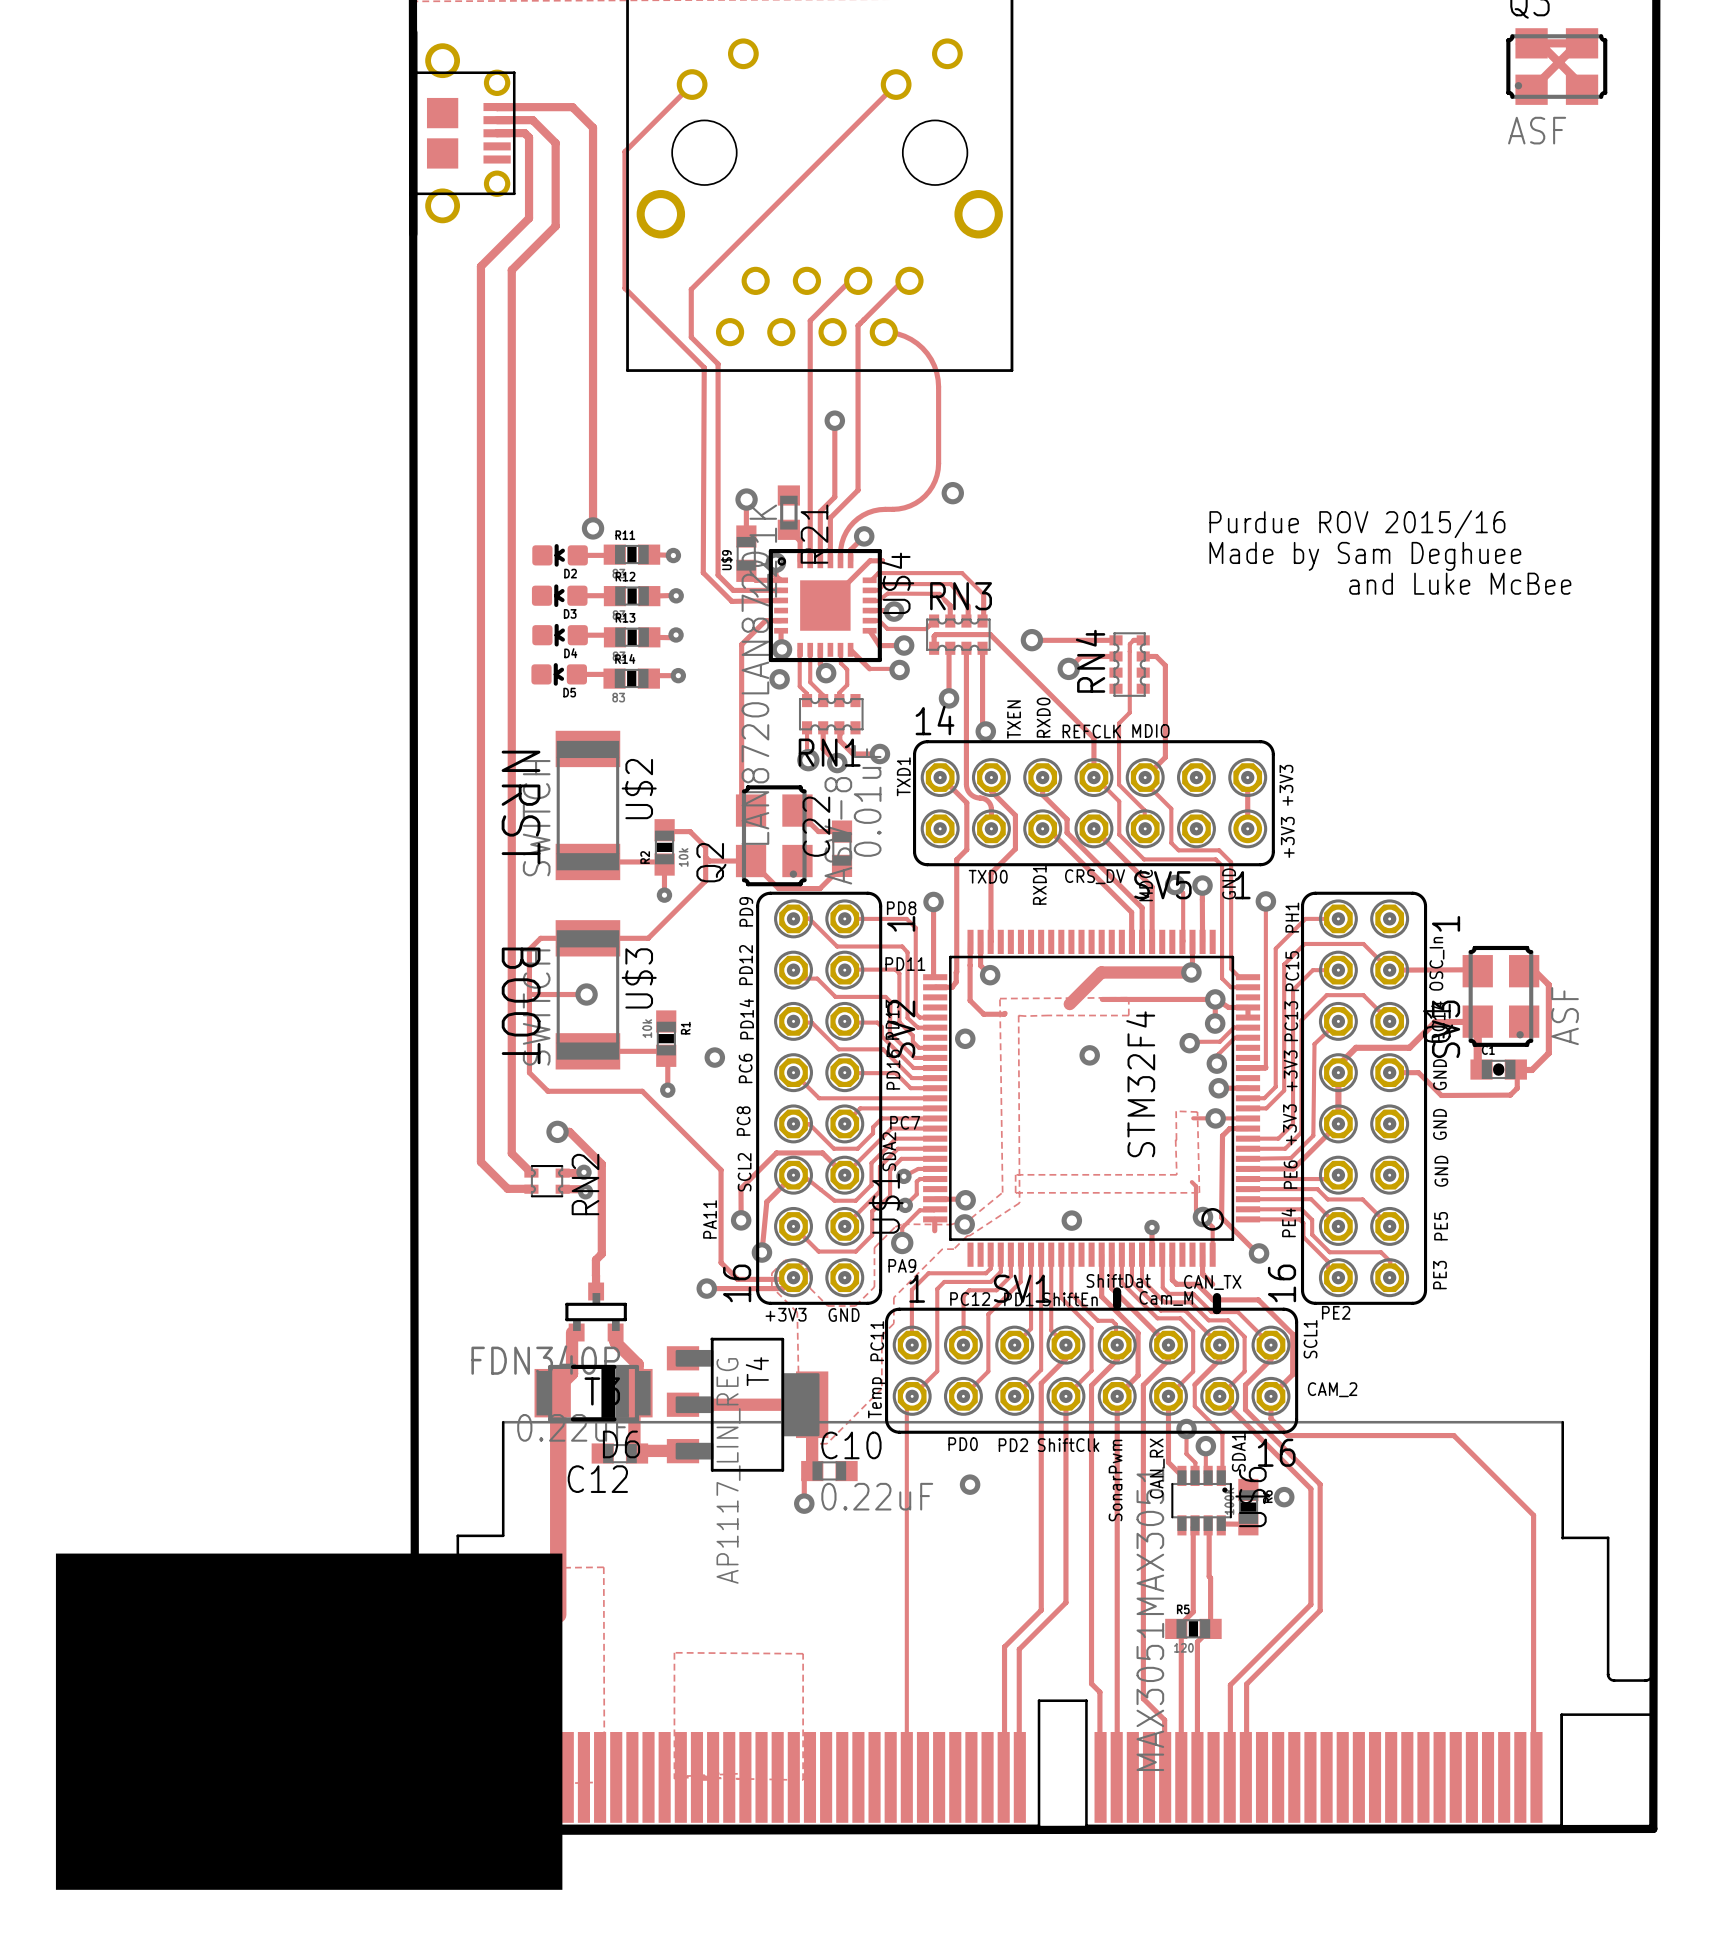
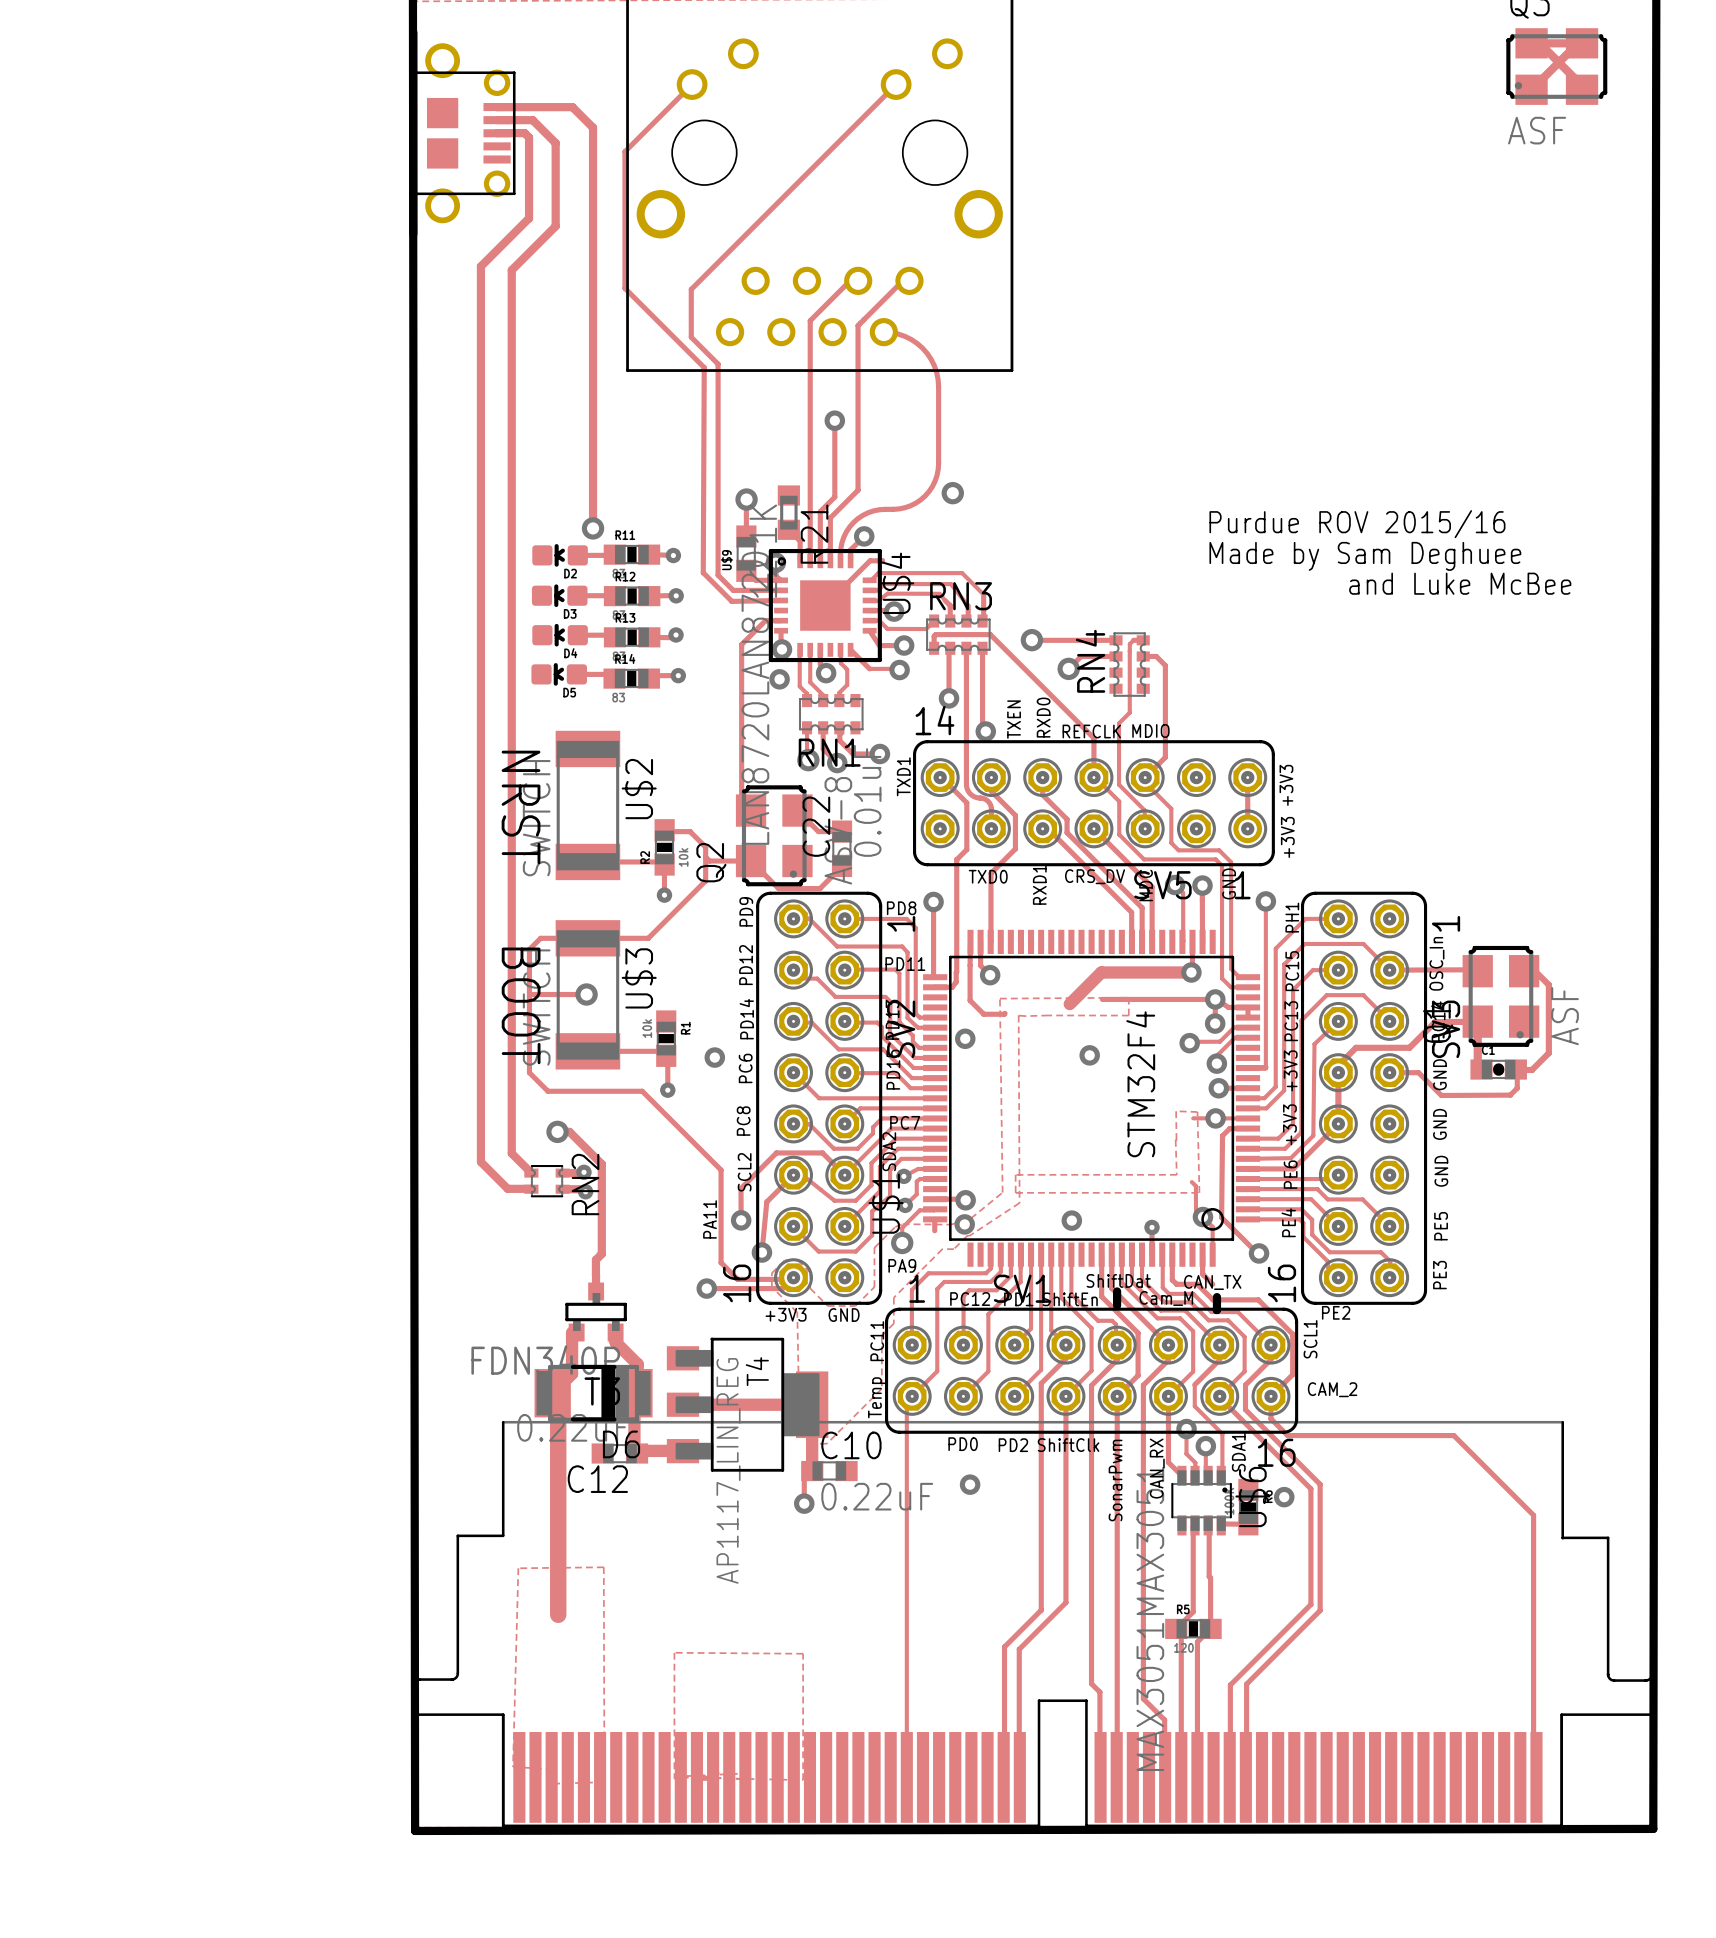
drawing: [55, 1553, 563, 1890] -> none

